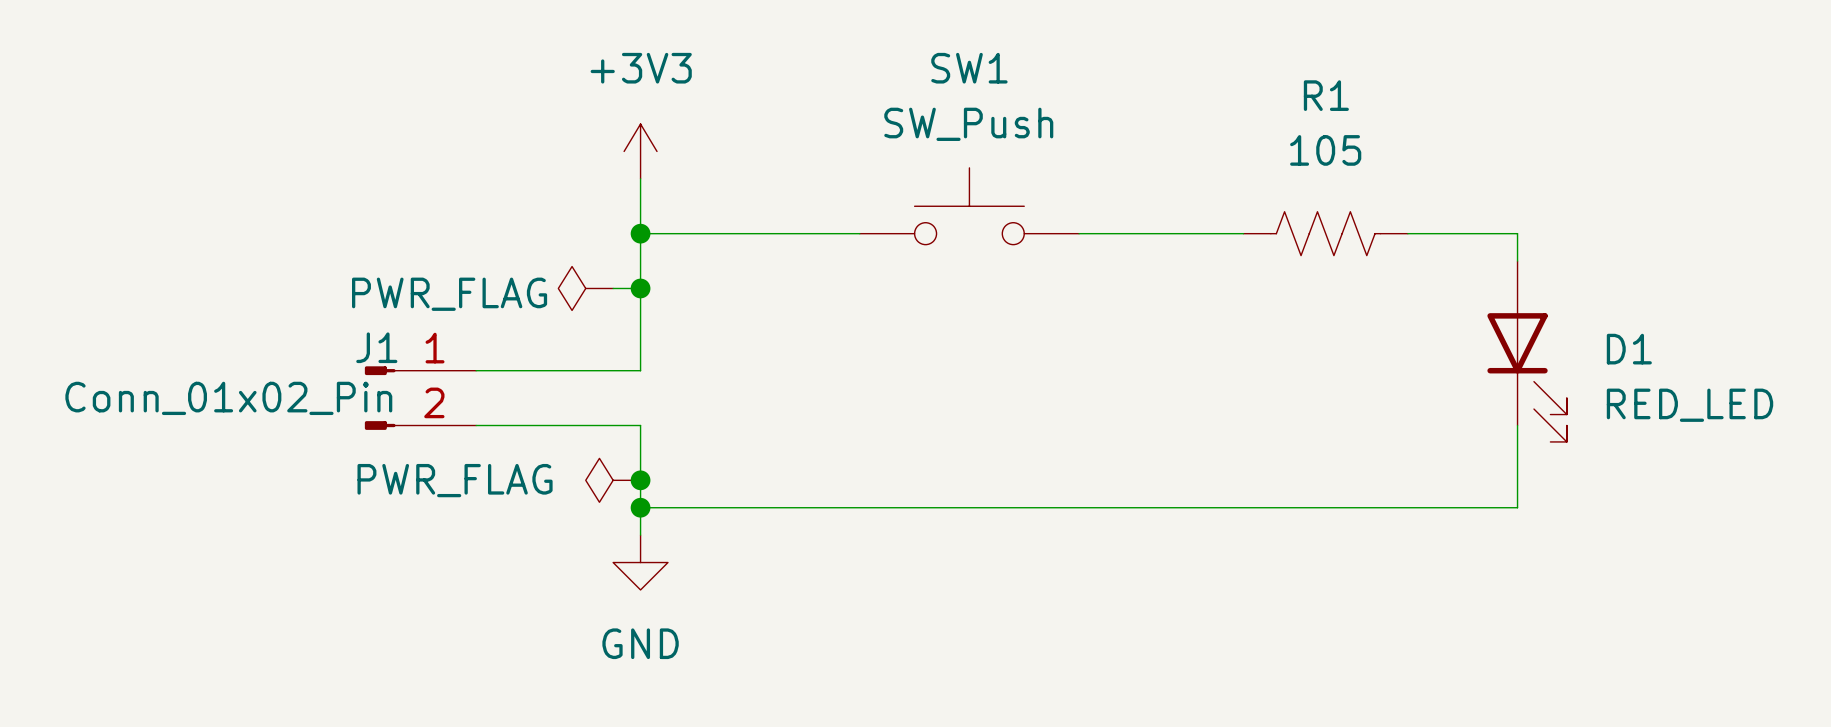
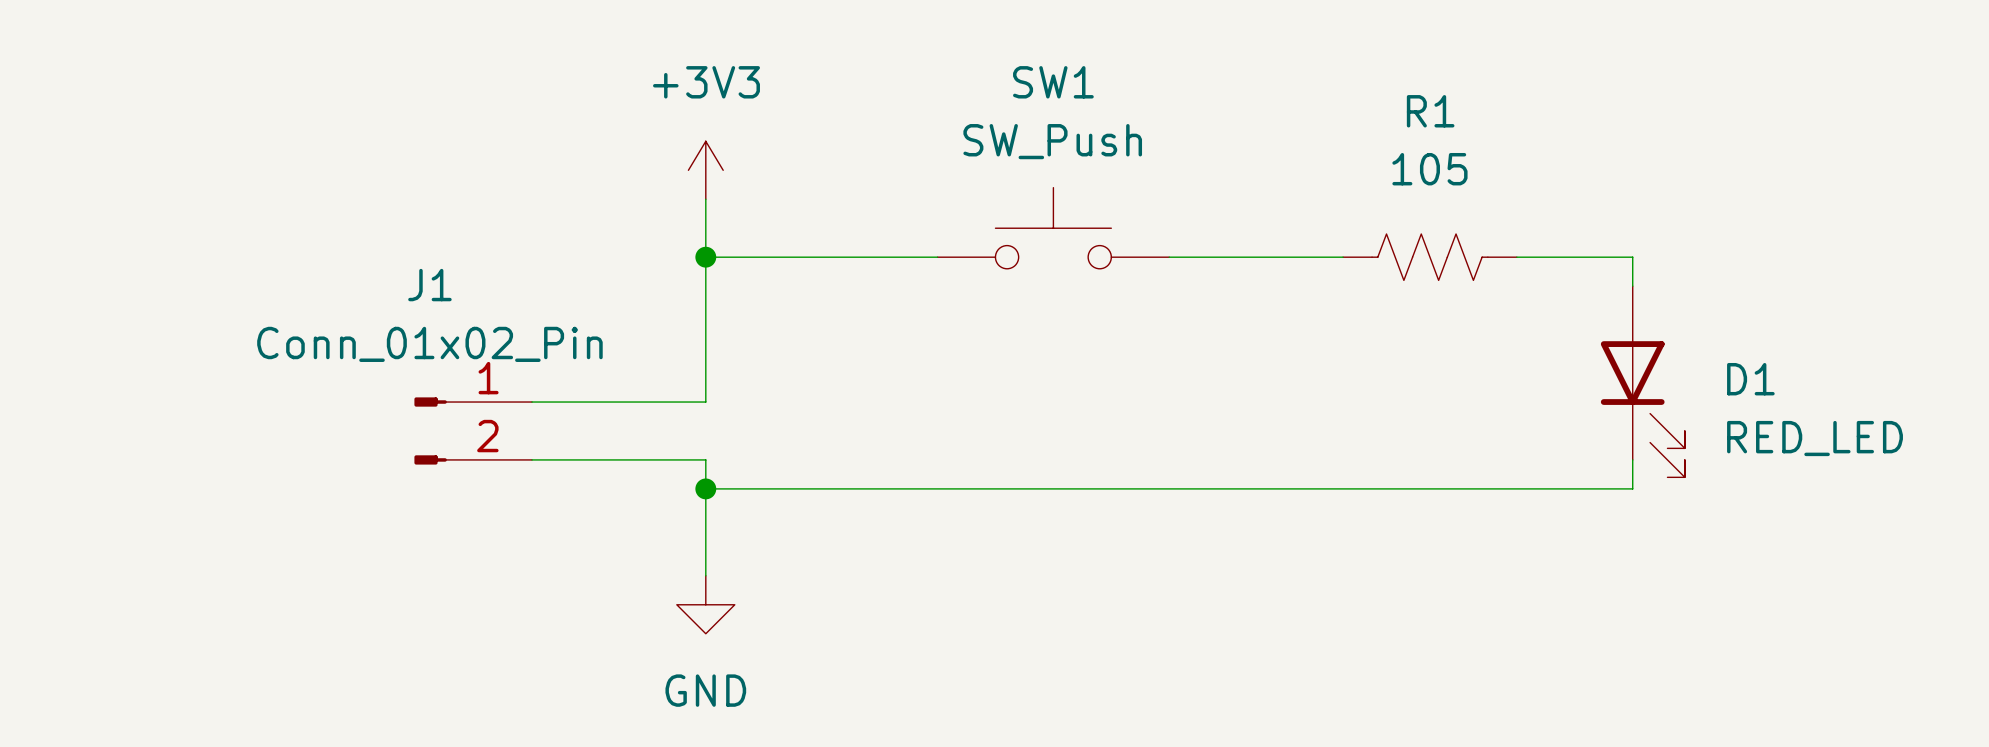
power symbol: PWR_FLAG (585, 288) -> none
wire: (613, 288) (640, 288) -> none
junction: (640, 288) -> none
J1 name position: J1 (376, 347) -> J1 (429, 285)
J1 value position: Conn_01x02_Pin (228, 398) -> Conn_01x02_Pin (429, 344)
junction: none -> (705, 488)
wire: (1517, 452) (1517, 507) (640, 507) -> (1632, 488) (705, 488)
power symbol: PWR_FLAG (613, 480) -> none
junction: (640, 480) -> none
junction: (640, 507) -> none

